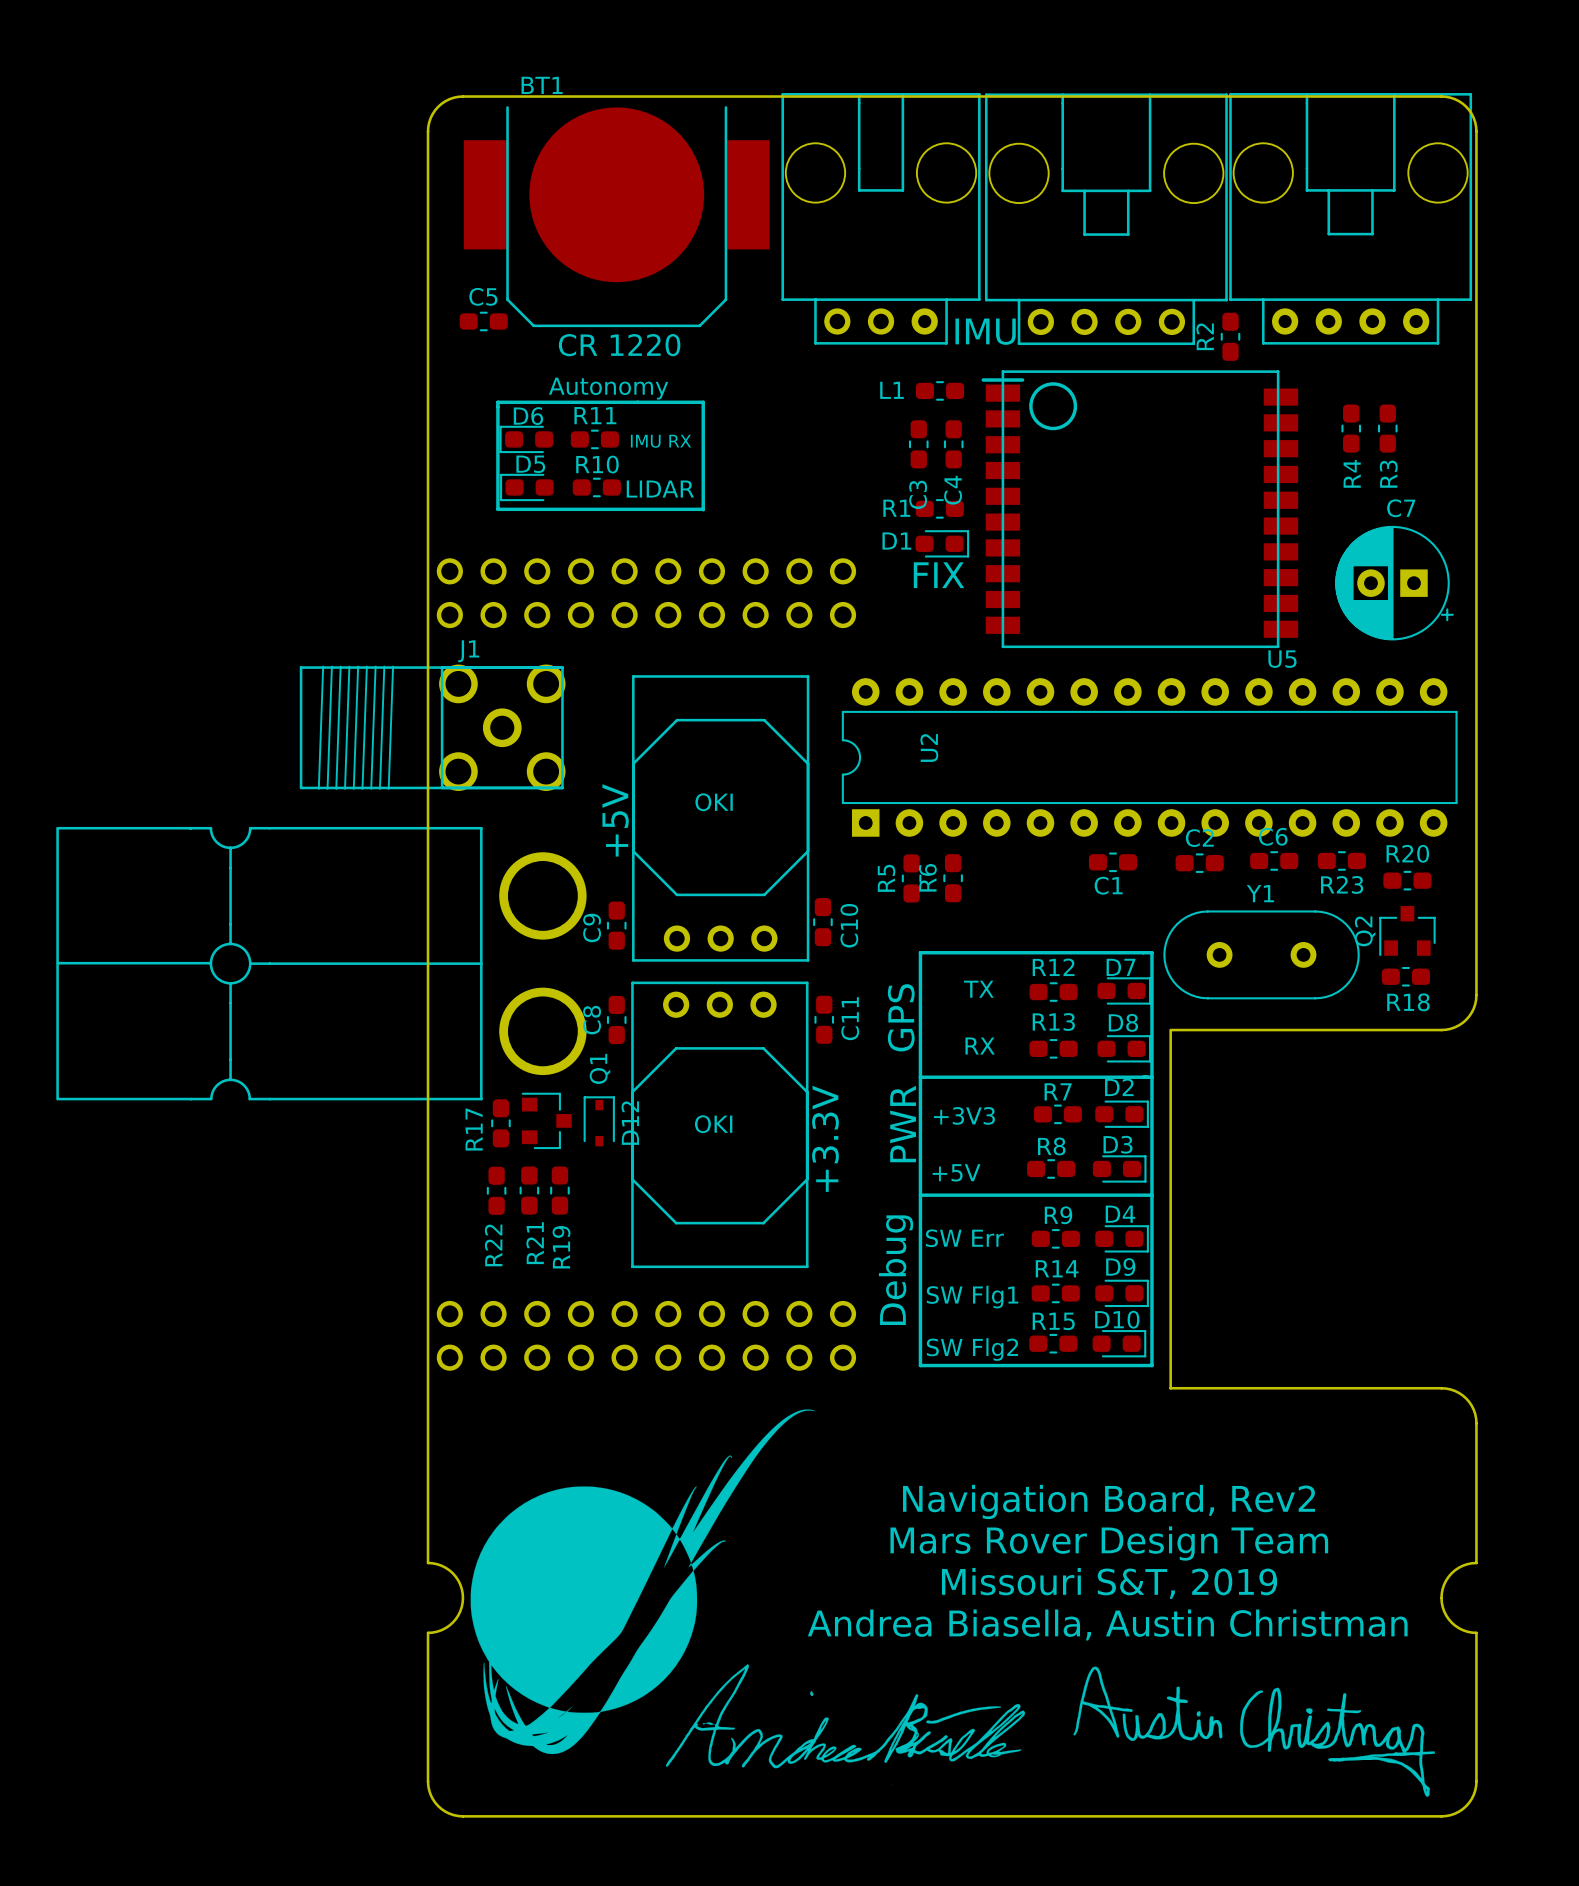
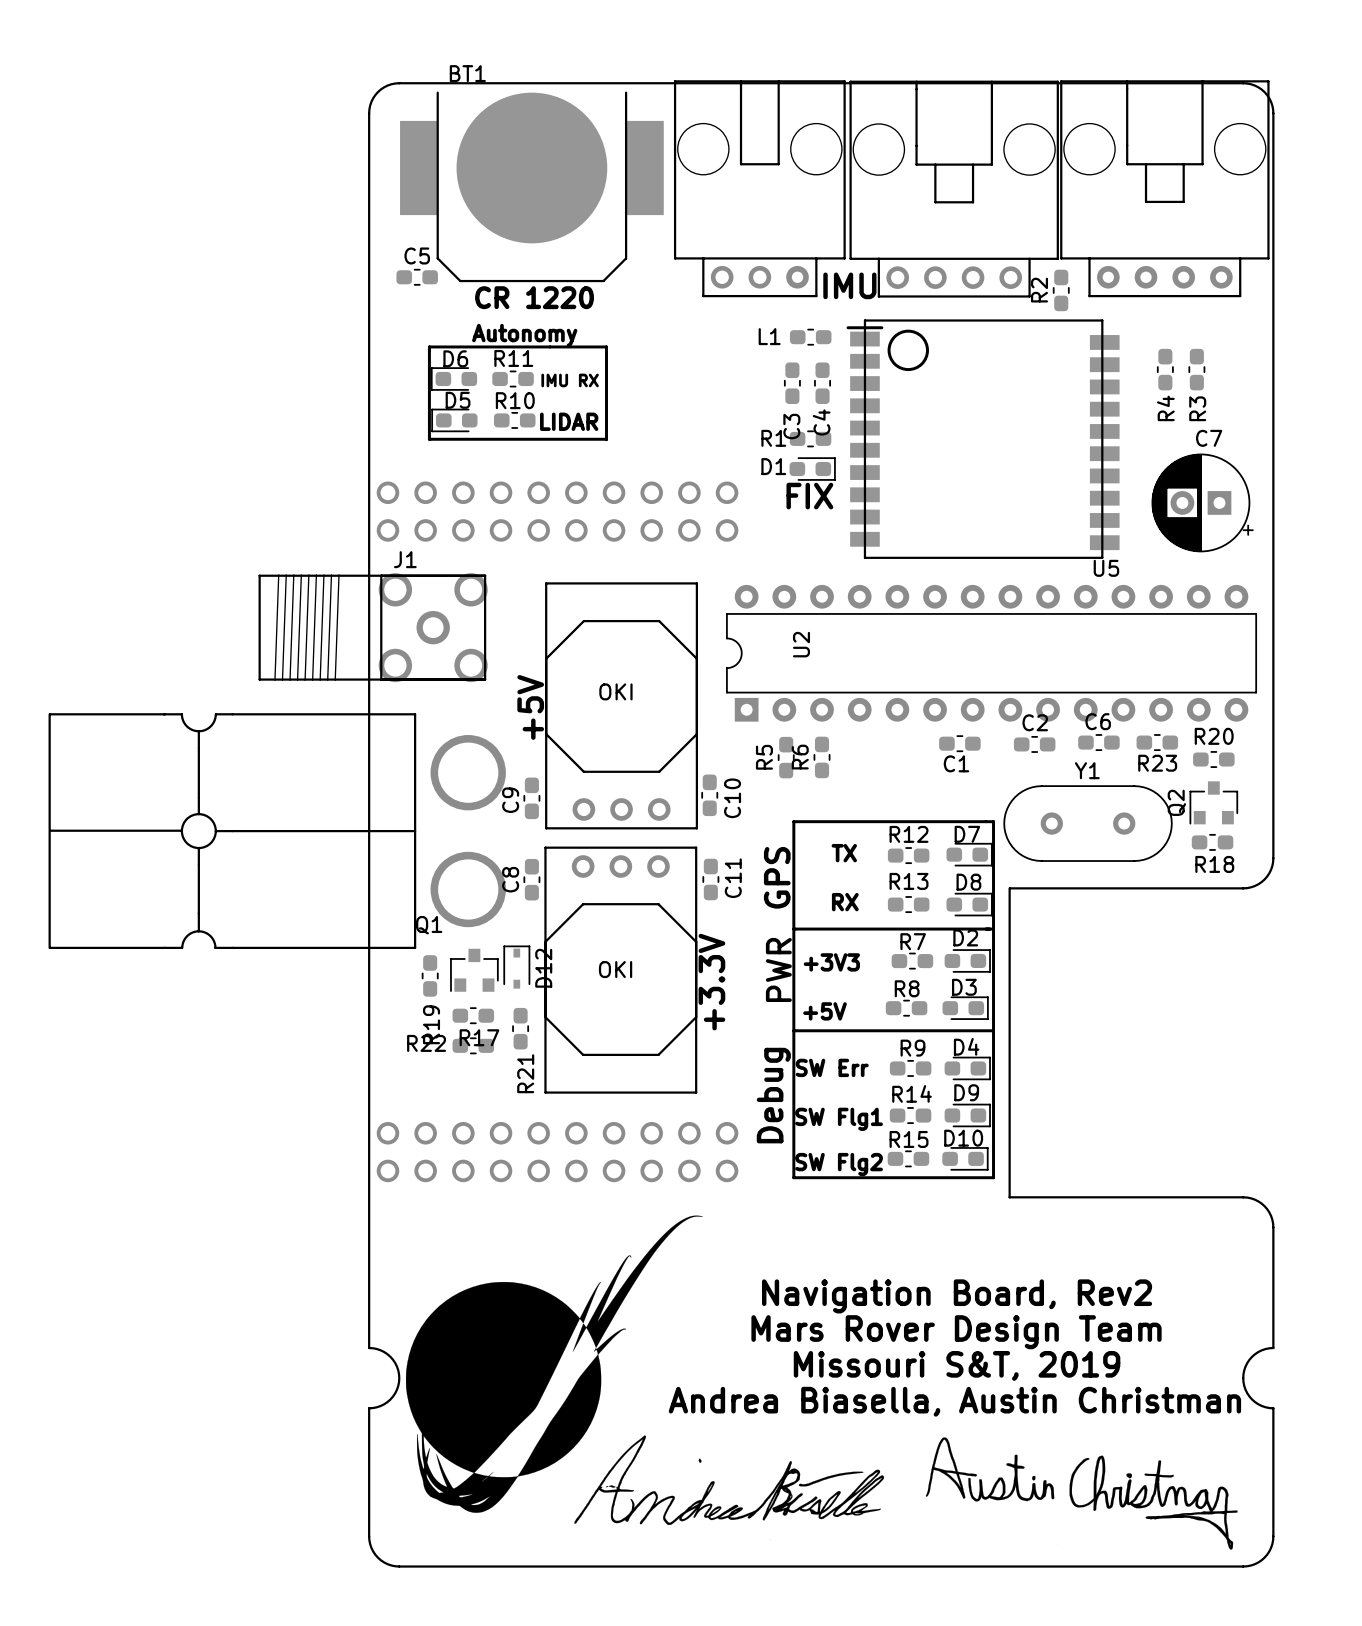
Q1 rotation: 0° (546, 1120) -> 90° counterclockwise (474, 970)
R17 rotation: 0° (500, 1123) -> 90° clockwise (473, 1015)
R17 position: (500, 1123) -> (473, 1015)
R17 name position: R17 (474, 1129) -> R17 (479, 1037)
R22 rotation: 0° (496, 1190) -> 90° clockwise (473, 1045)
R22 position: (496, 1190) -> (473, 1045)
R21 position: (529, 1190) -> (520, 1028)
R19 position: (559, 1190) -> (430, 975)

